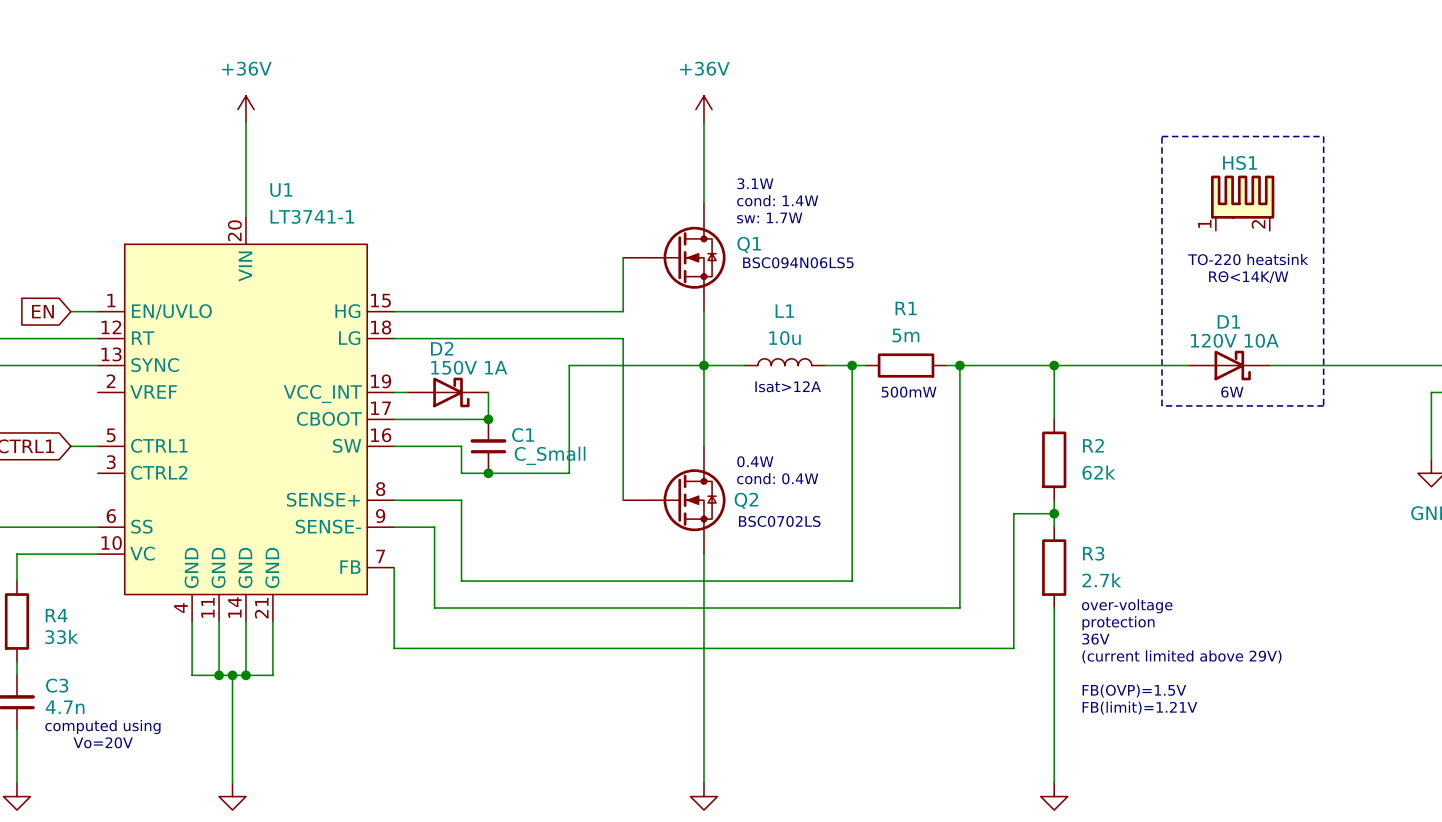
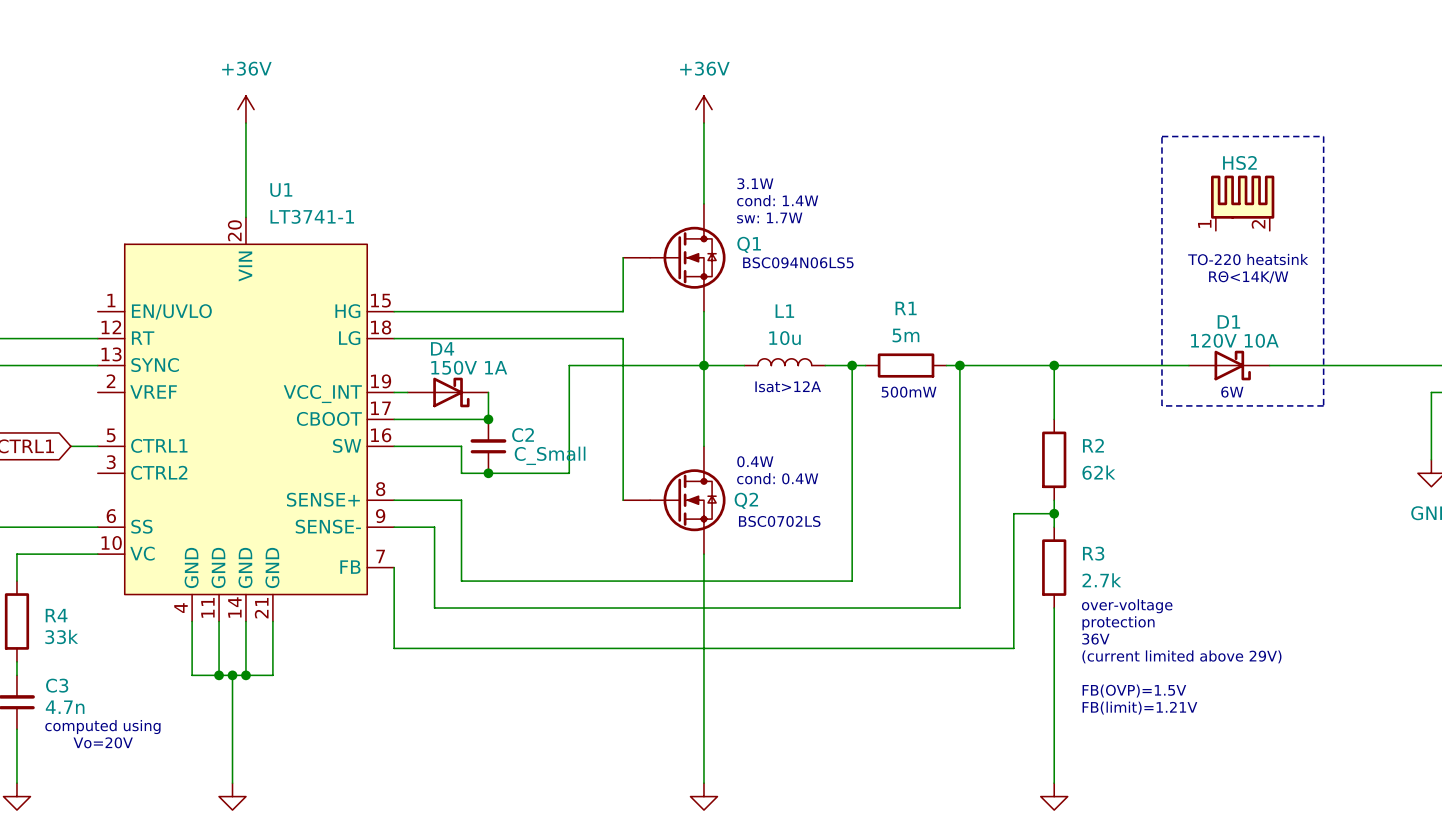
HS1 name: HS1 (1240, 162) -> HS2 (1239, 162)
global label: EN (42, 311) -> none
wire: (70, 311) (97, 311) -> none
D2 name: D2 (442, 348) -> D4 (442, 348)
C1 name: C1 (523, 435) -> C2 (523, 435)

